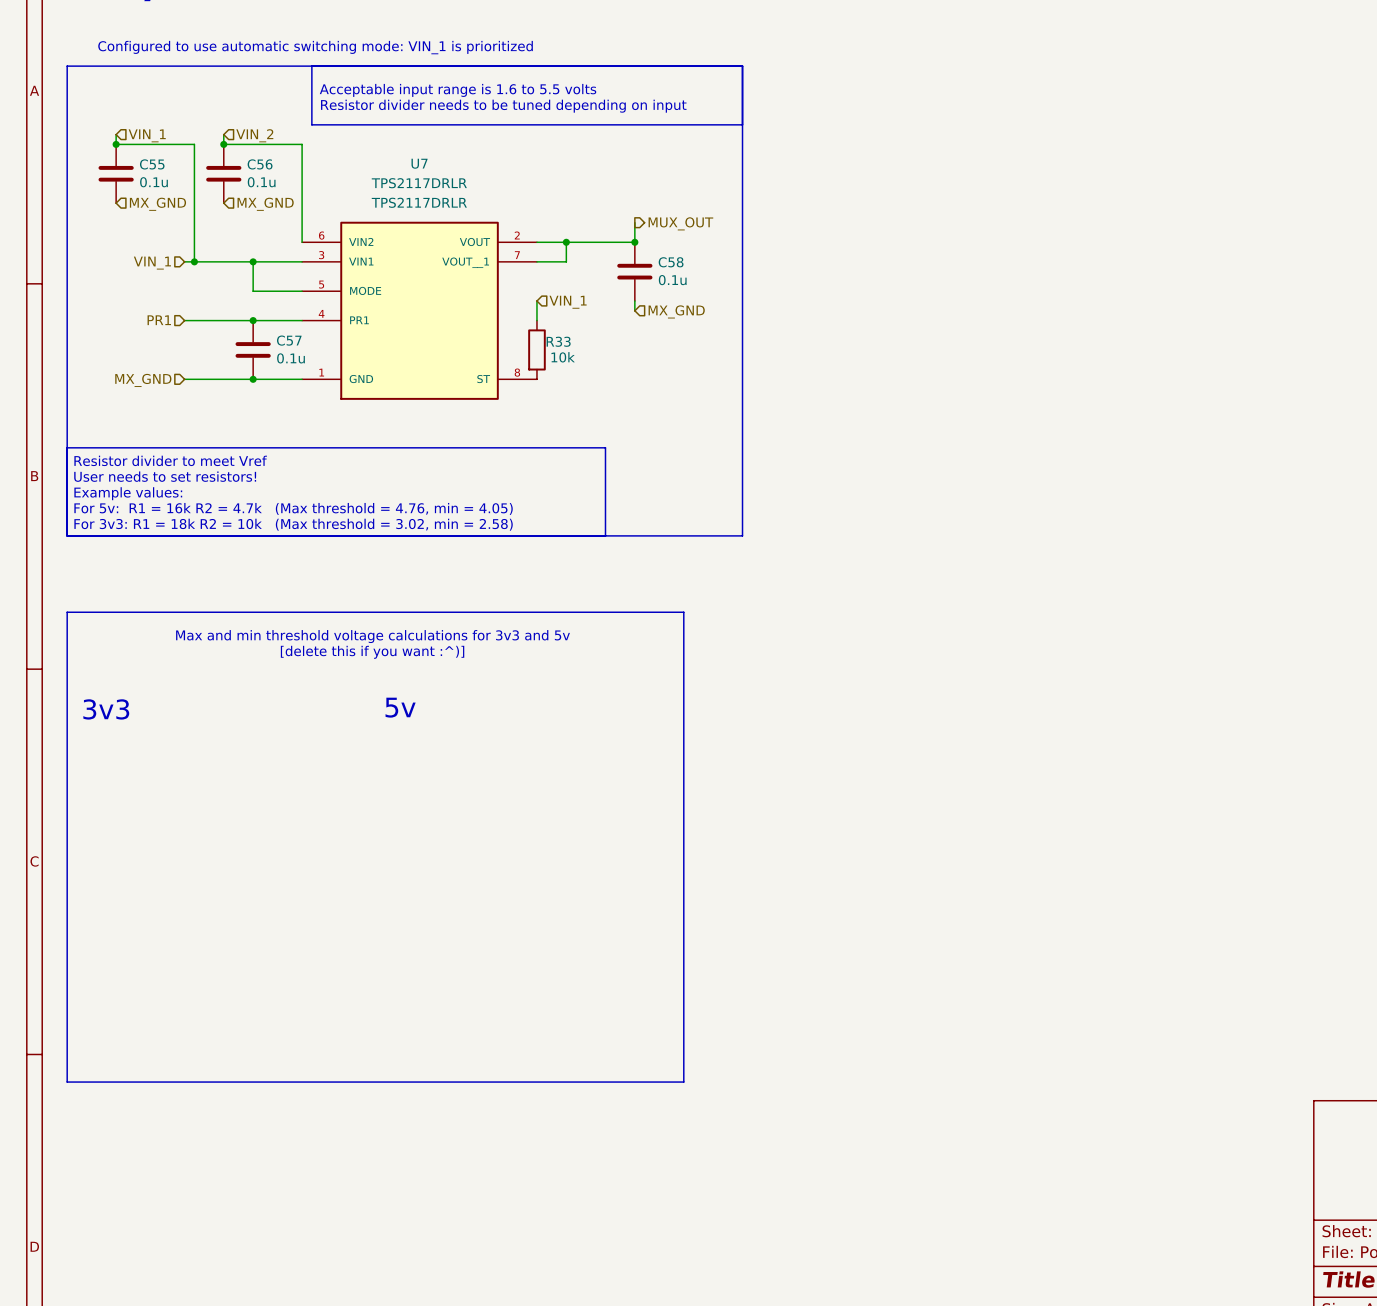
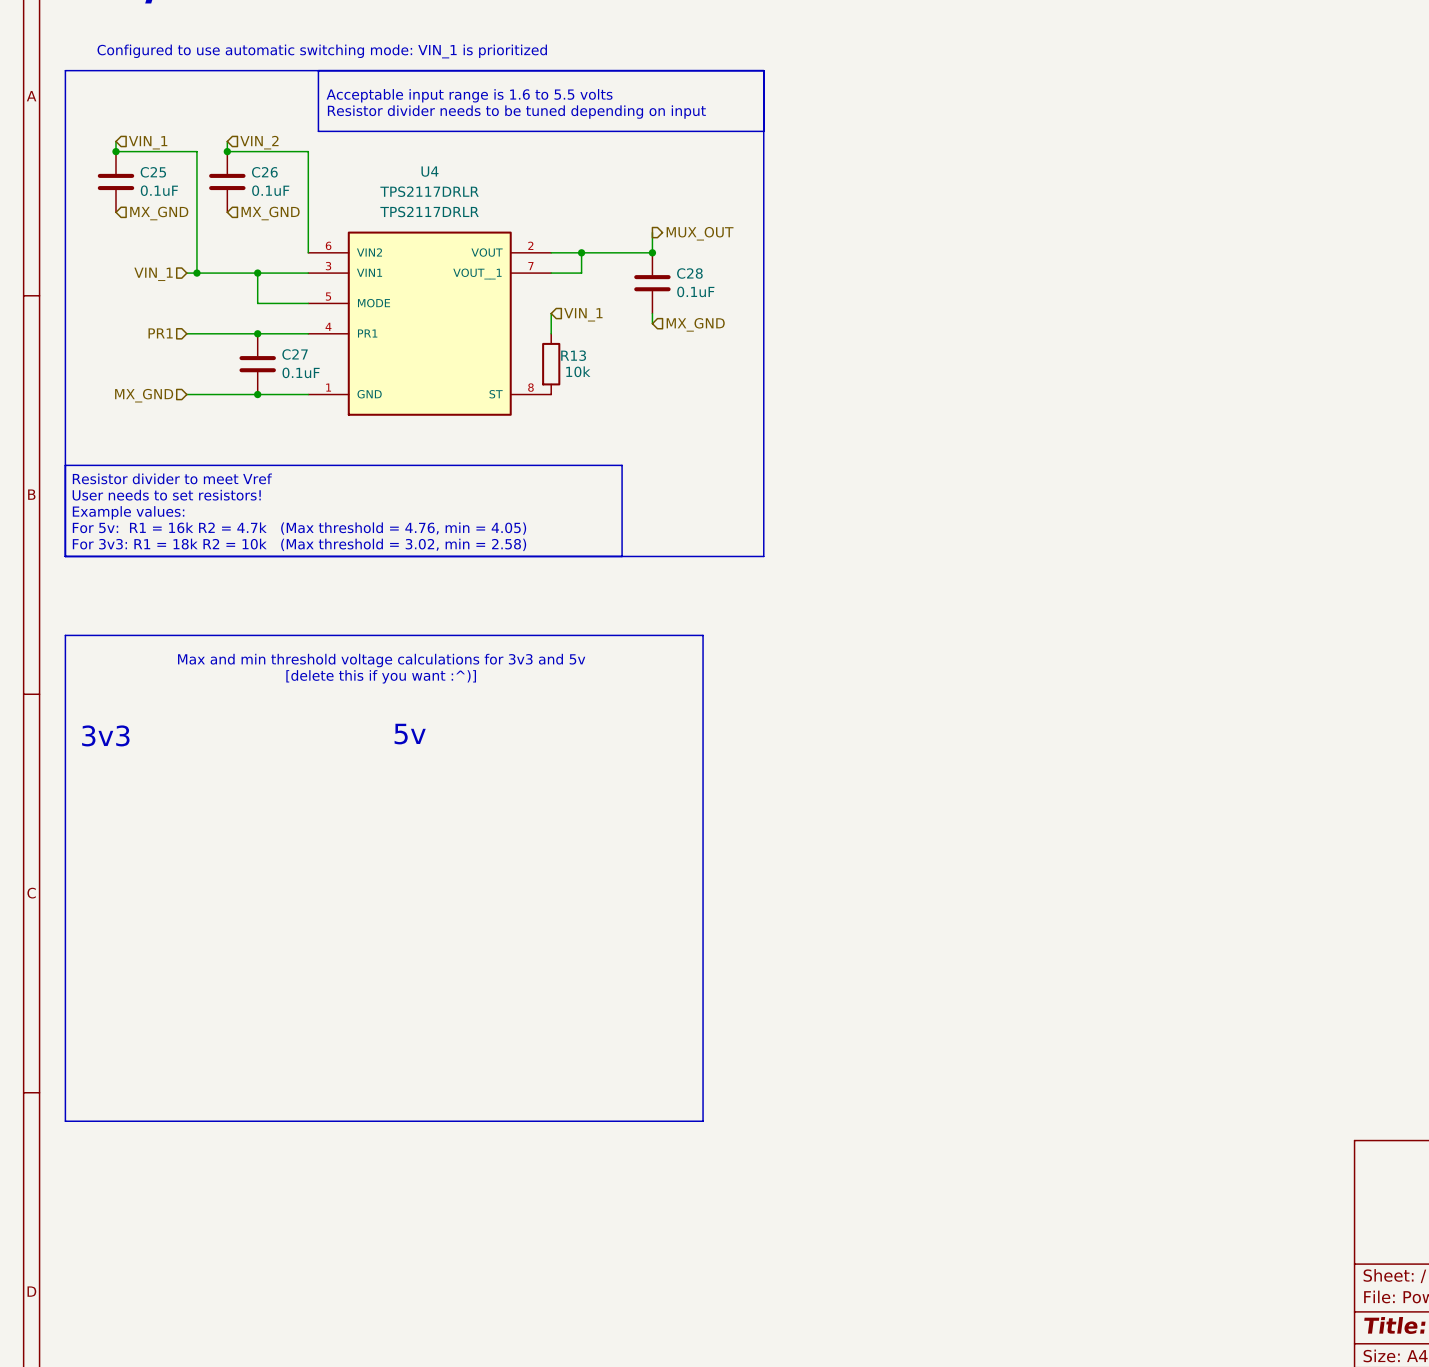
U7 name: U7 (419, 163) -> U4 (429, 171)
C55 name: C55 (152, 164) -> C25 (153, 172)
C56 name: C56 (260, 164) -> C26 (264, 172)
C55 value: 0.1u (153, 182) -> 0.1uF (159, 190)
C56 value: 0.1u (261, 182) -> 0.1uF (270, 190)
C58 name: C58 (671, 262) -> C28 (689, 273)
C58 value: 0.1u (672, 280) -> 0.1uF (695, 291)
C57 name: C57 (289, 340) -> C27 (295, 354)
R33 name: R33 (558, 341) -> R13 (573, 355)
C57 value: 0.1u (291, 358) -> 0.1uF (301, 372)

